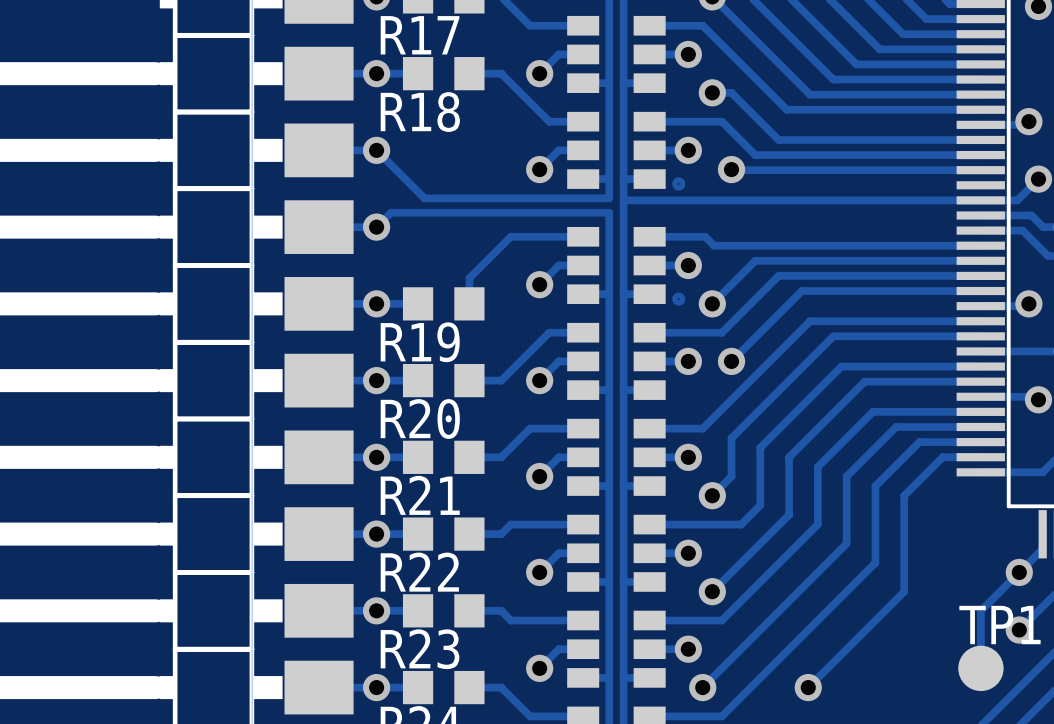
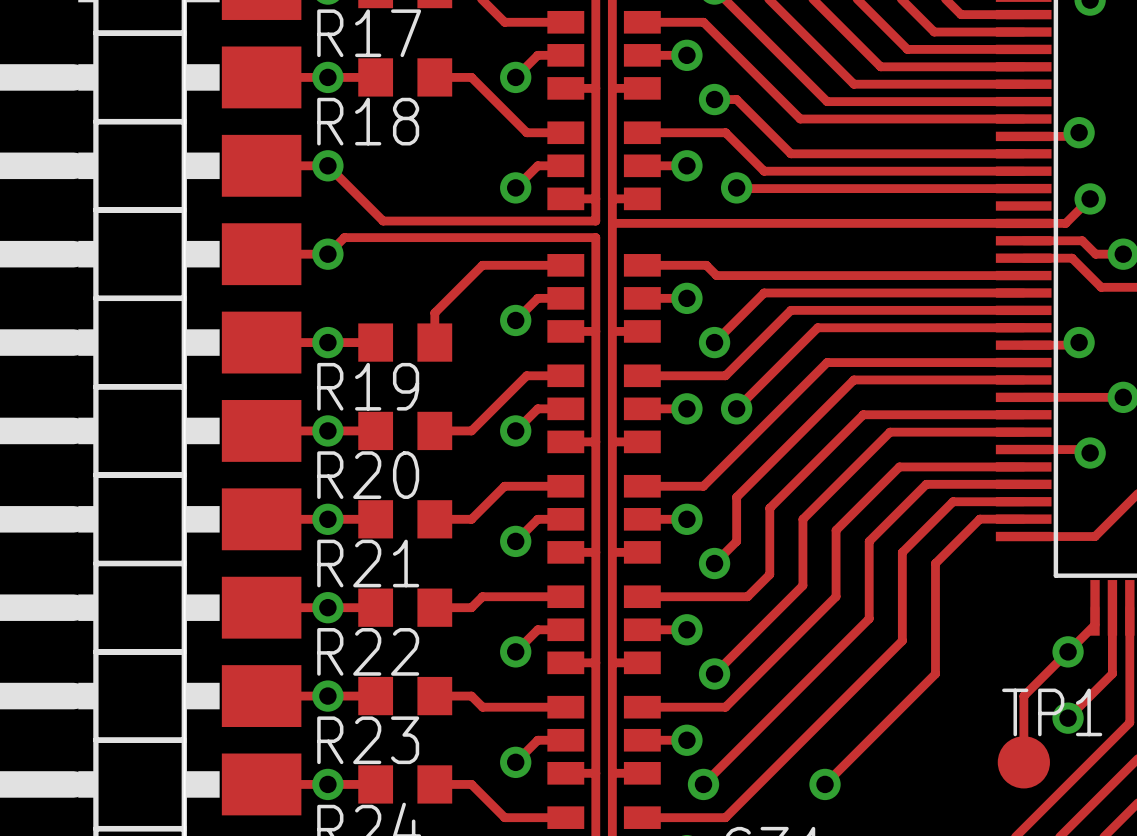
drawing: [672, 177, 686, 191] -> none
drawing: [672, 292, 686, 306] -> none

